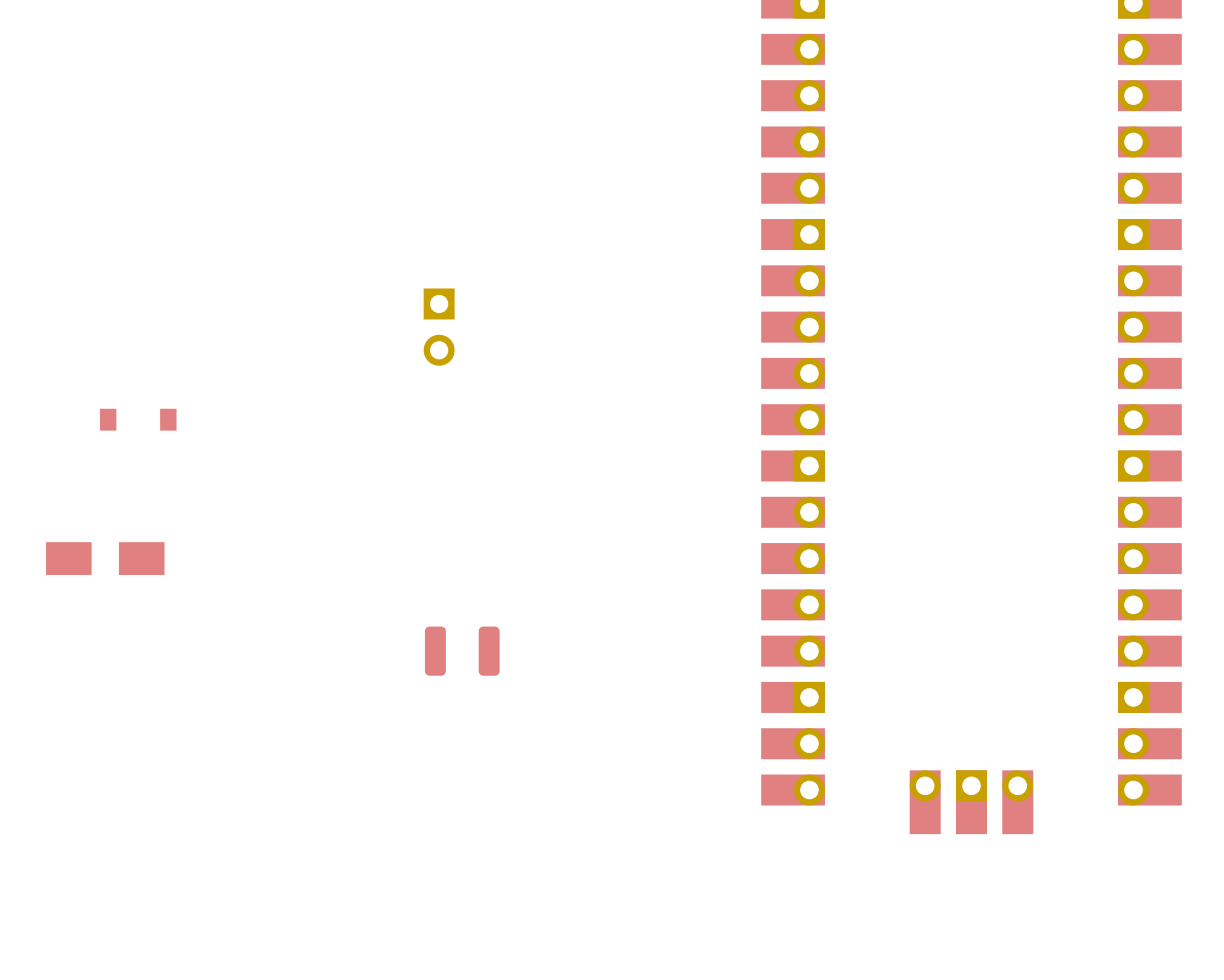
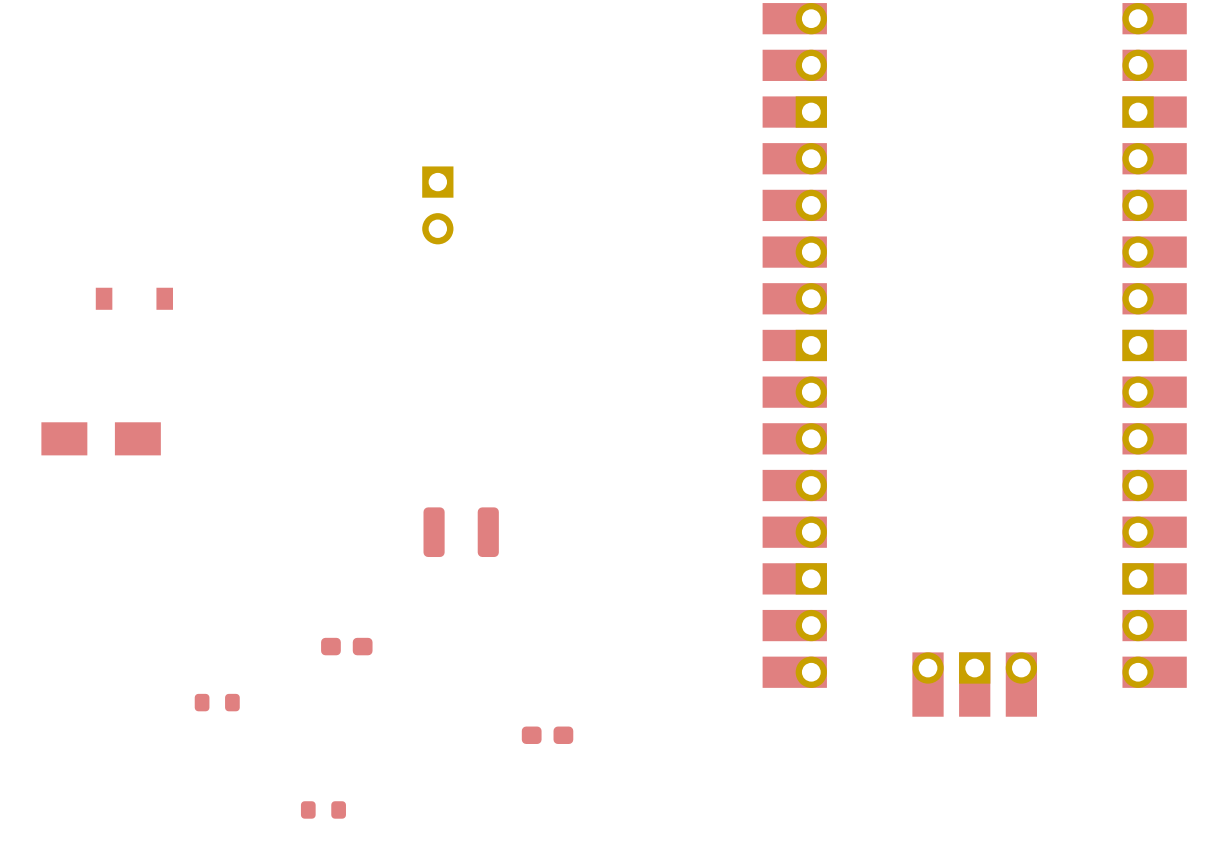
part: none -> (346, 646)
part: none -> (217, 702)
part: none -> (547, 735)
part: none -> (323, 809)

